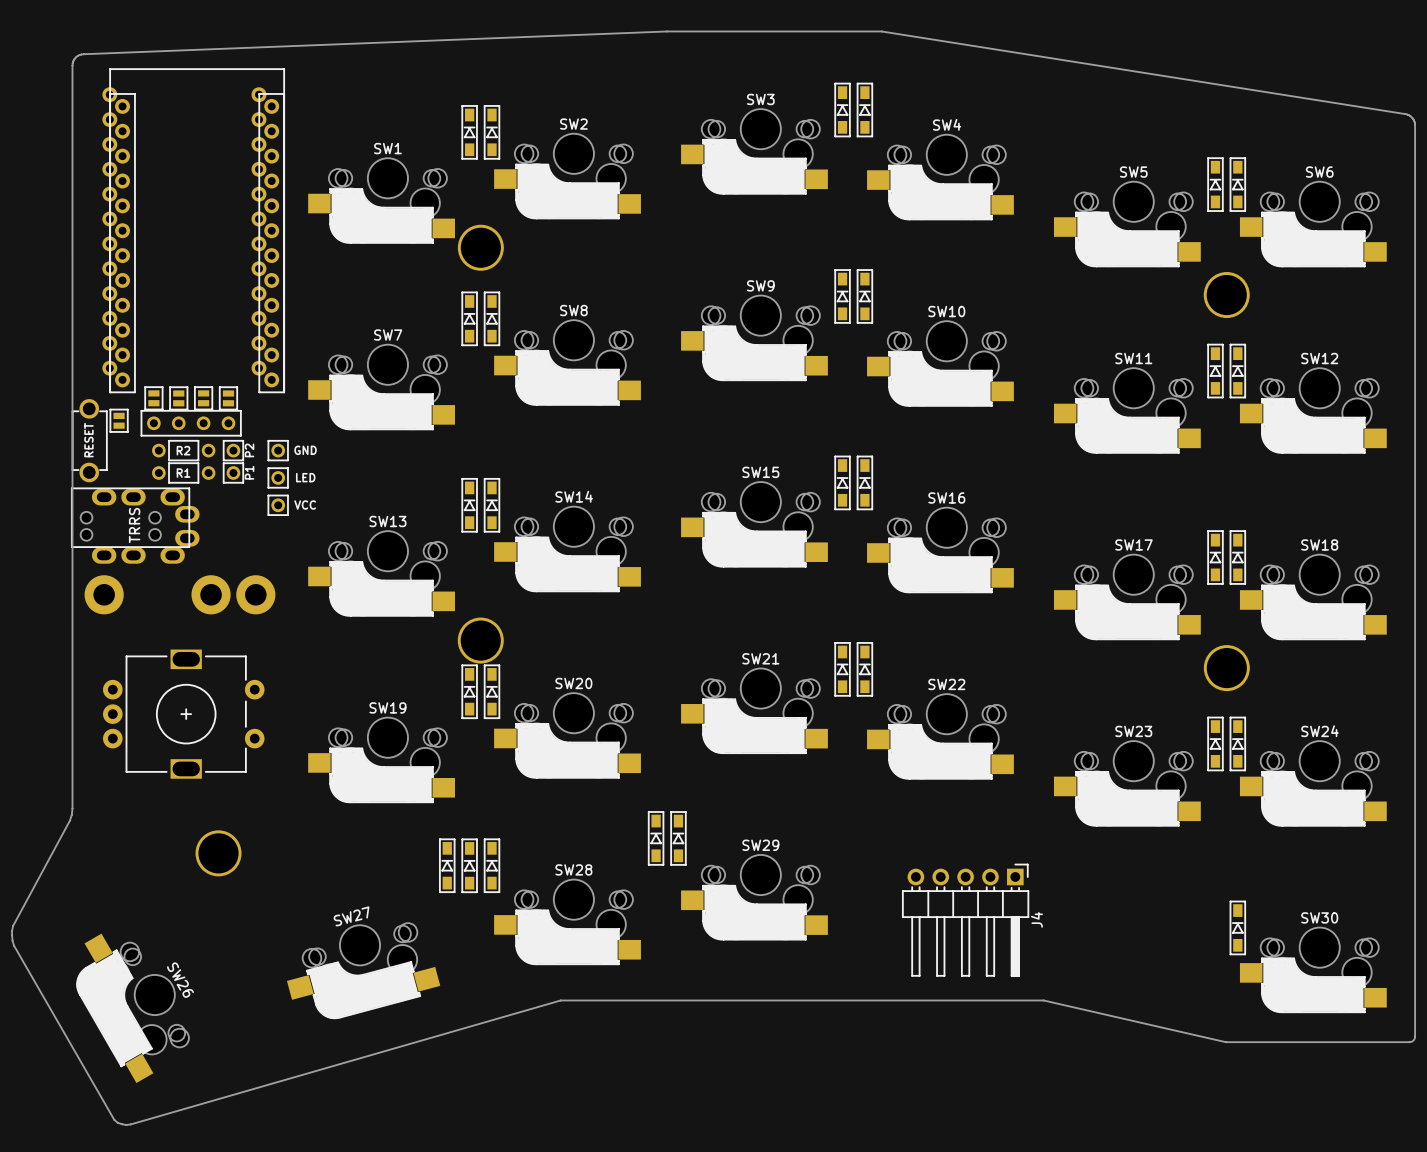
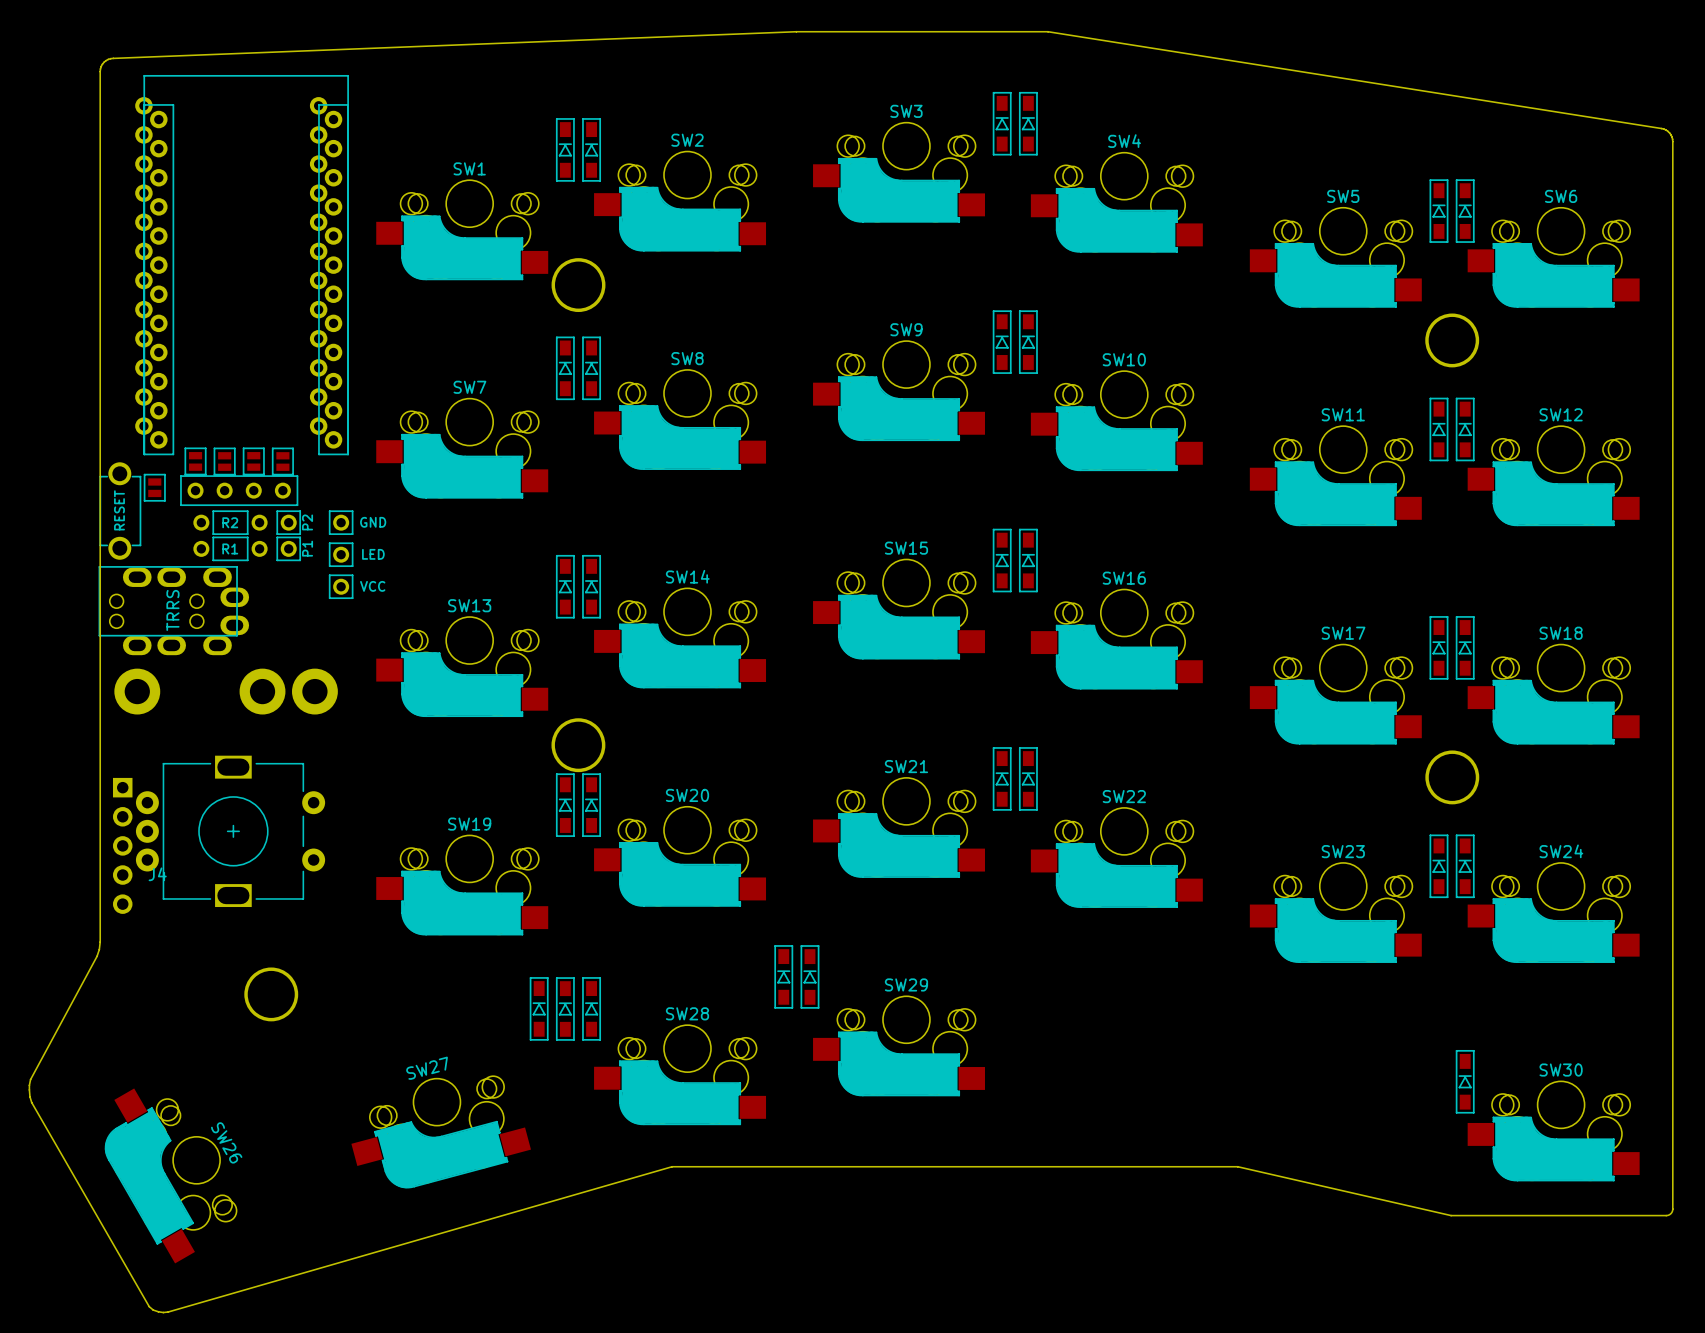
J4 side: top (965, 920) -> bottom (122, 845)

